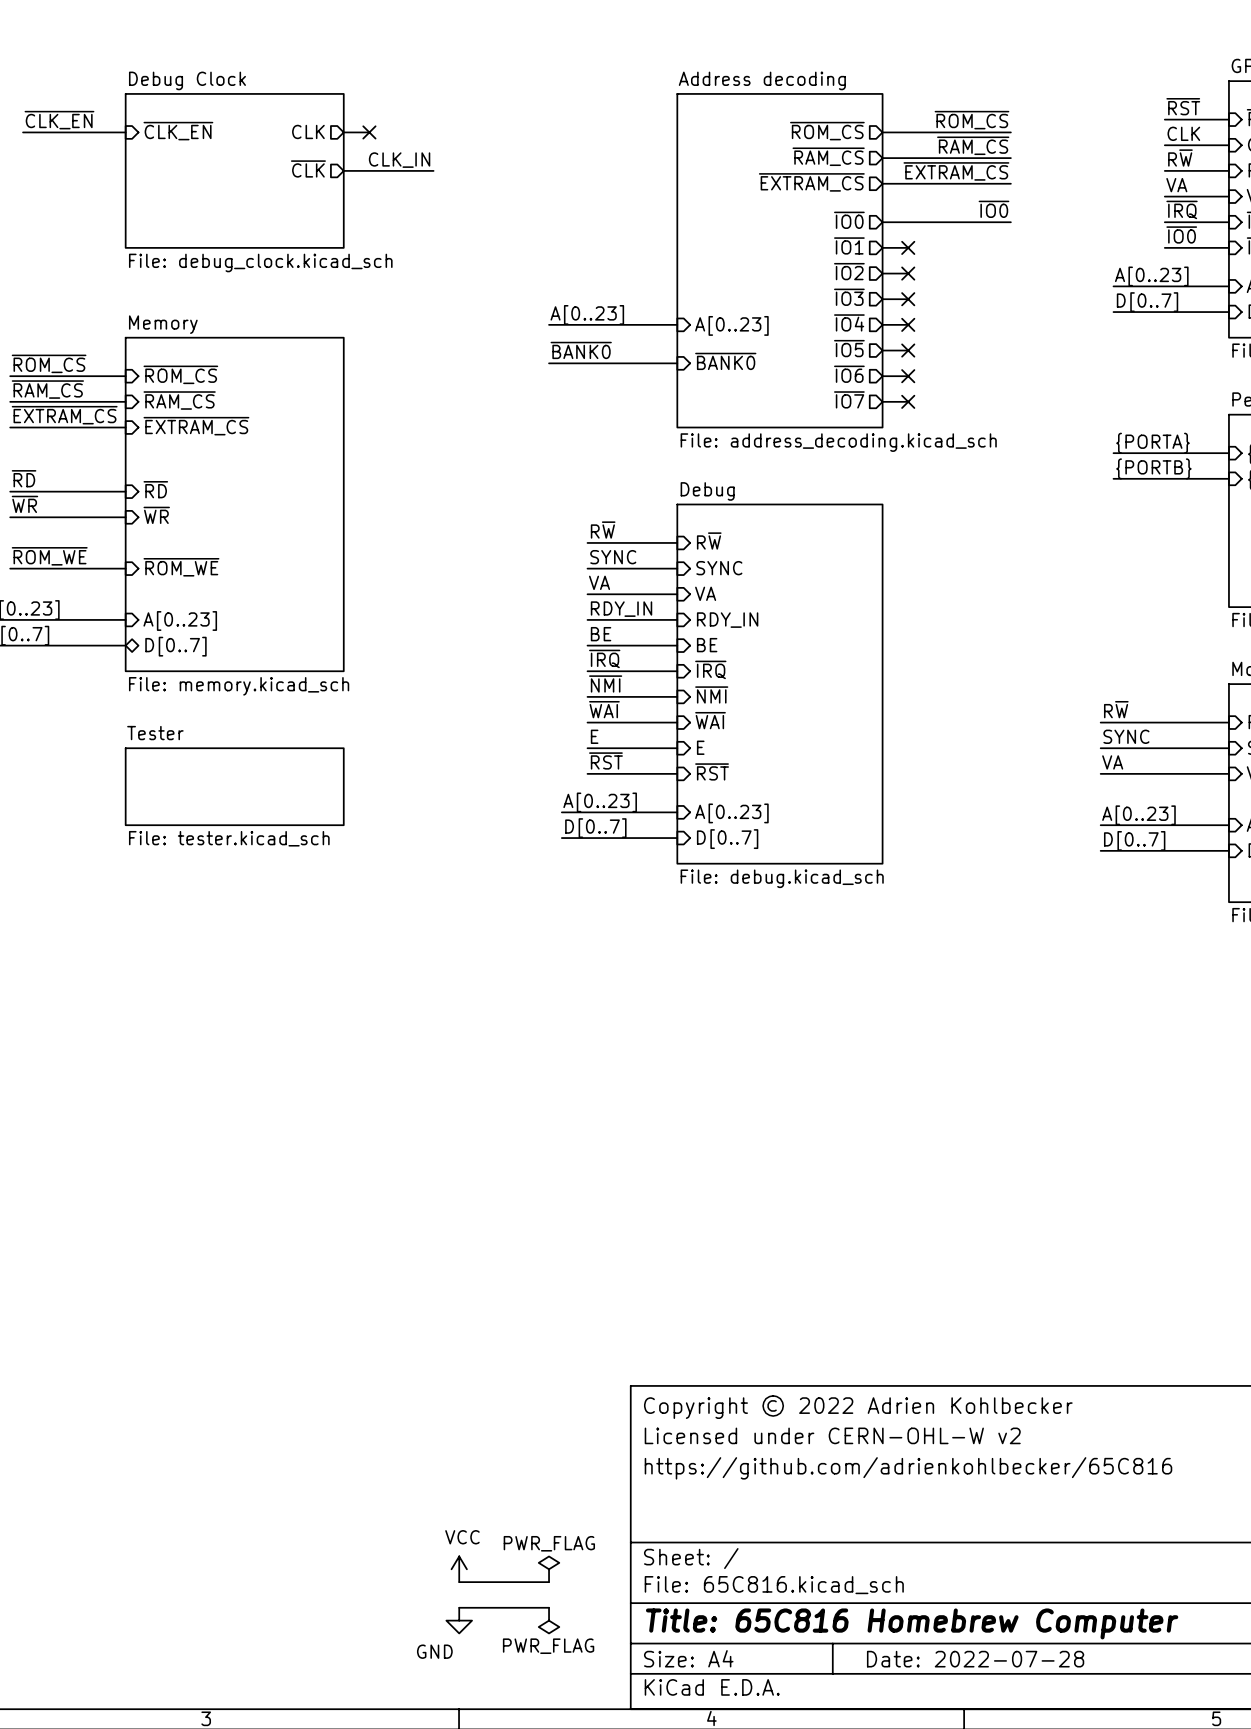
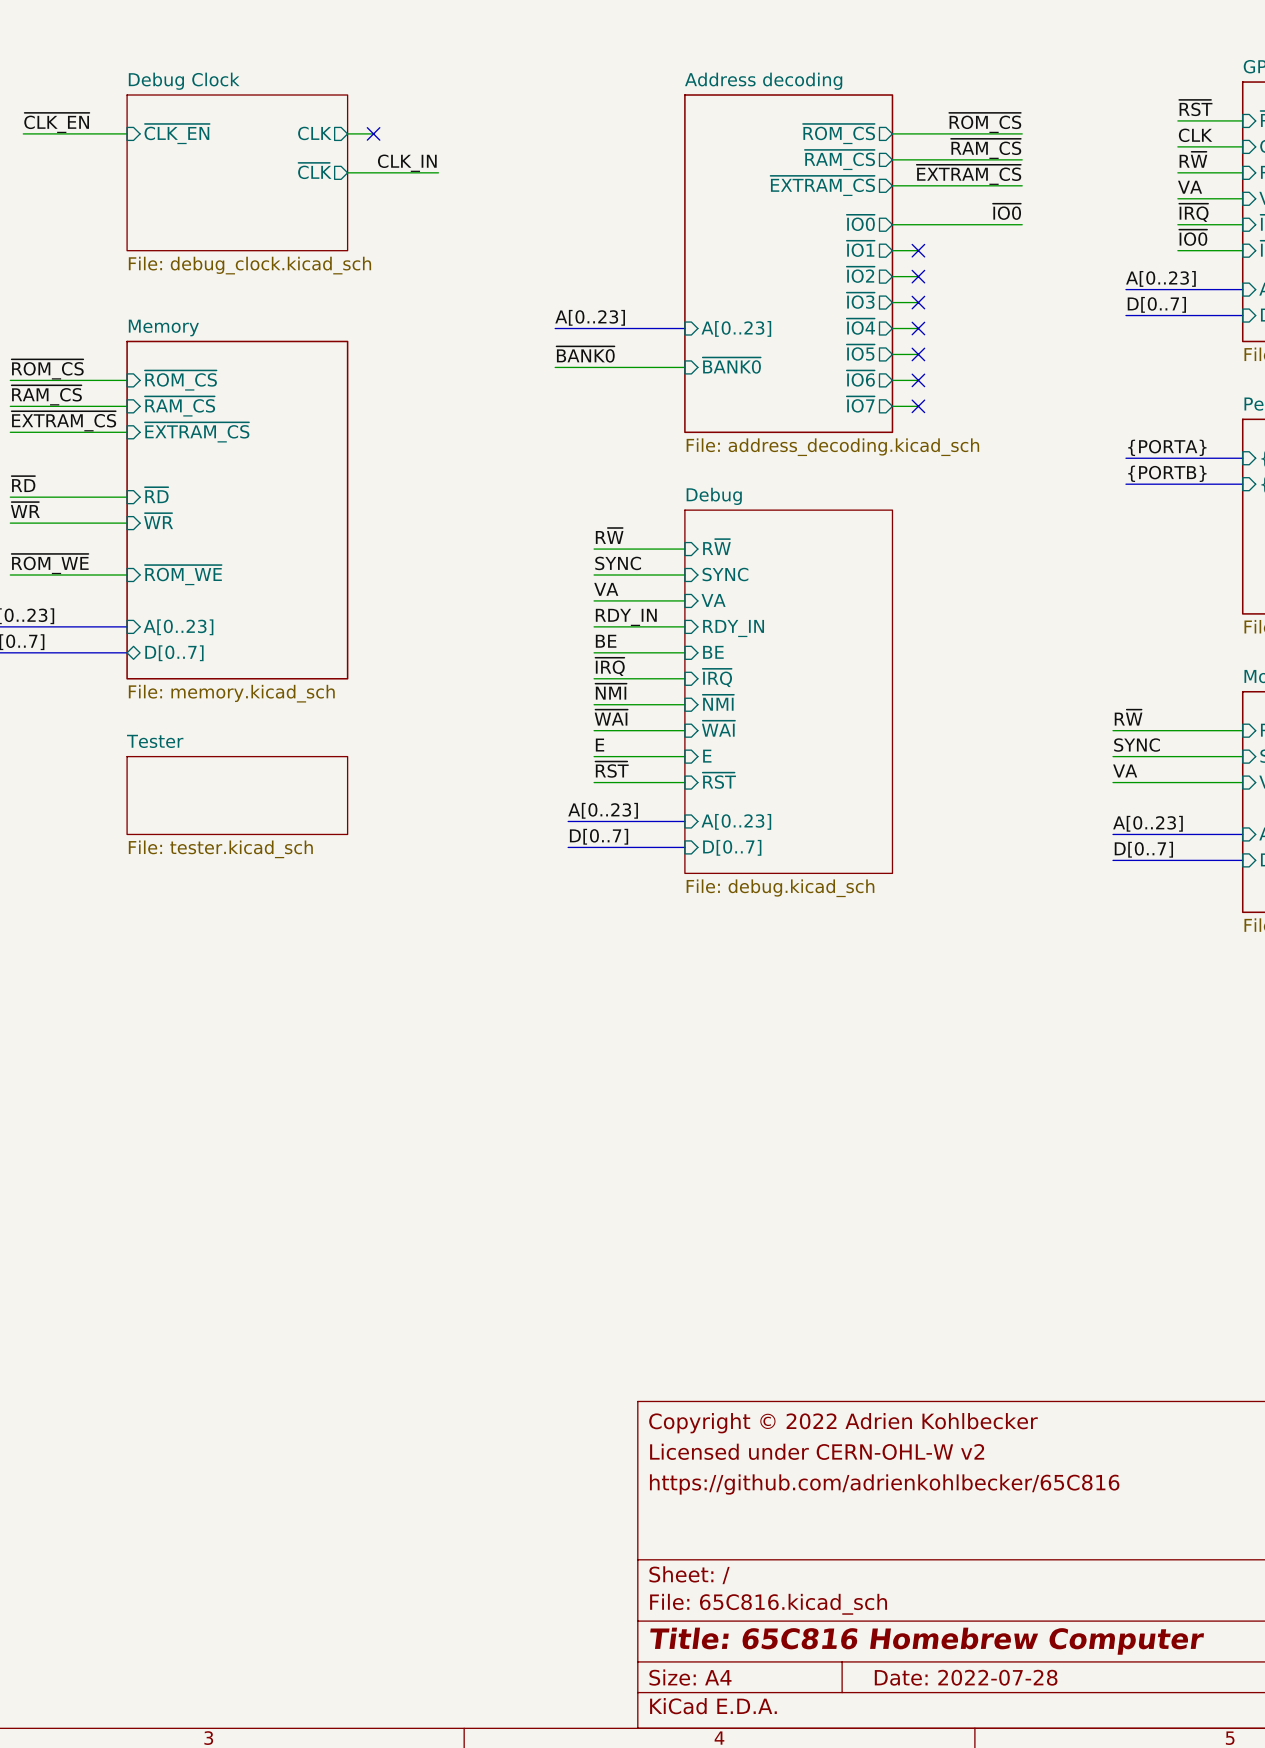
power symbol: VCC (459, 1569) -> none
power symbol: PWR_FLAG (549, 1569) -> none
wire: (459, 1582) (549, 1582) -> none
wire: (459, 1607) (549, 1607) -> none
power symbol: GND (459, 1620) -> none
power symbol: PWR_FLAG (549, 1620) -> none

